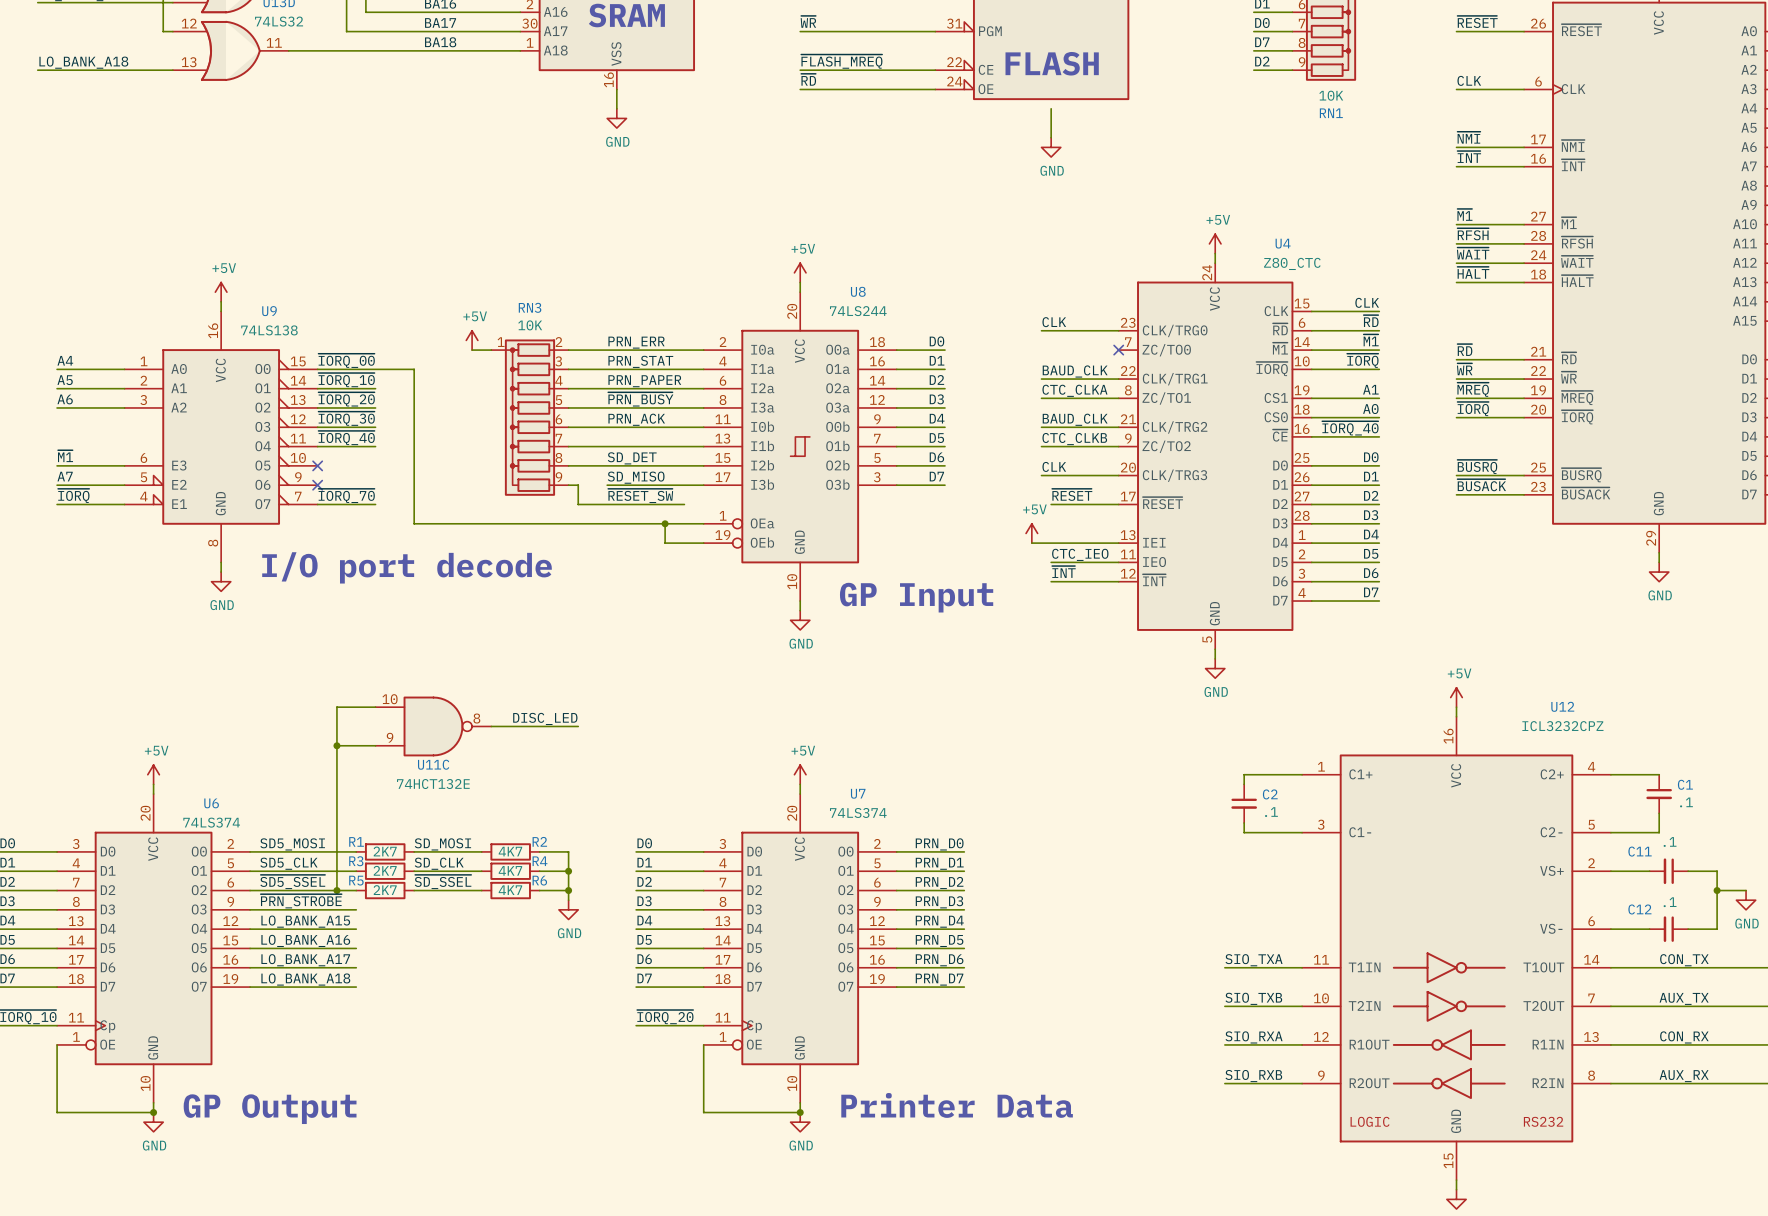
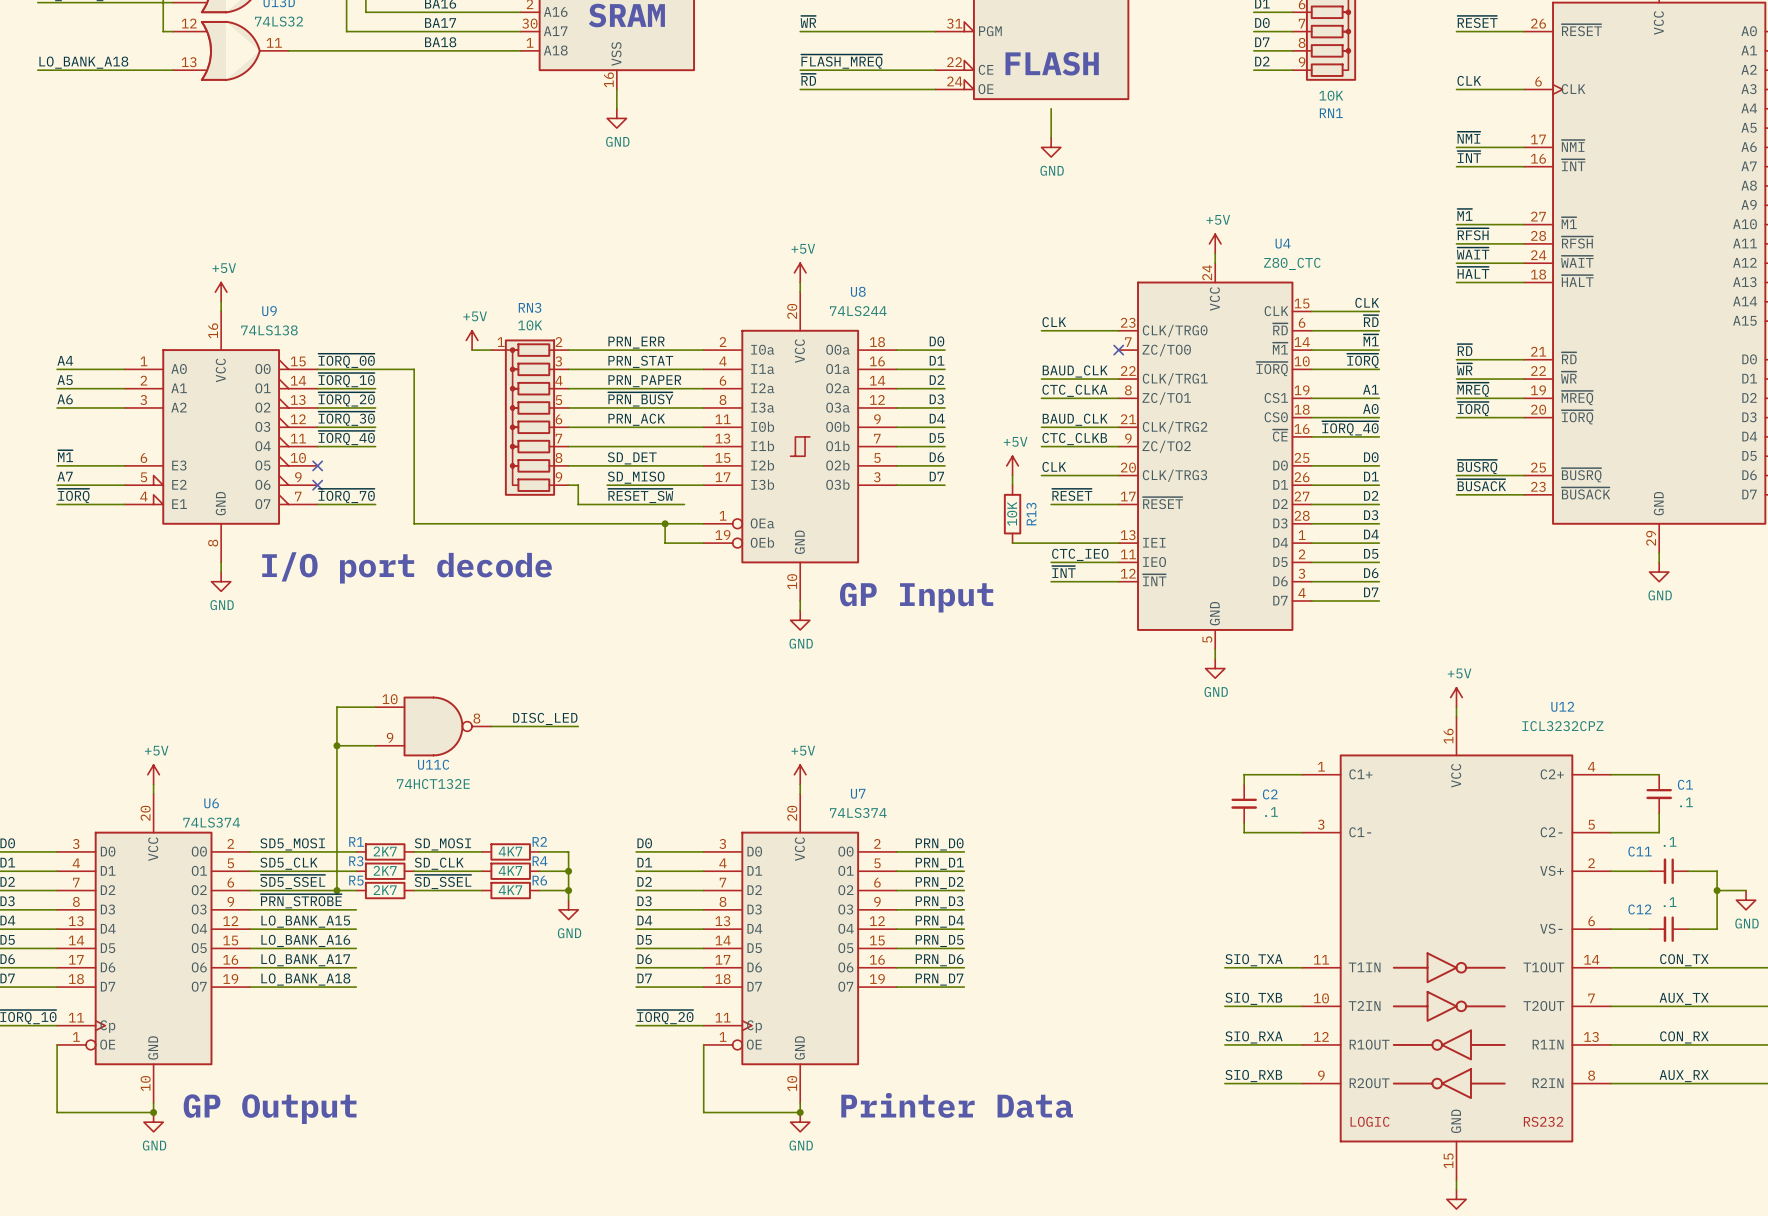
wire: none -> (1012, 475) (1012, 485)
R13: none -> 10K (1012, 514)
power symbol position: +5V (1031, 533) -> +5V (1012, 465)
wire: none -> (1012, 543) (1031, 543)

